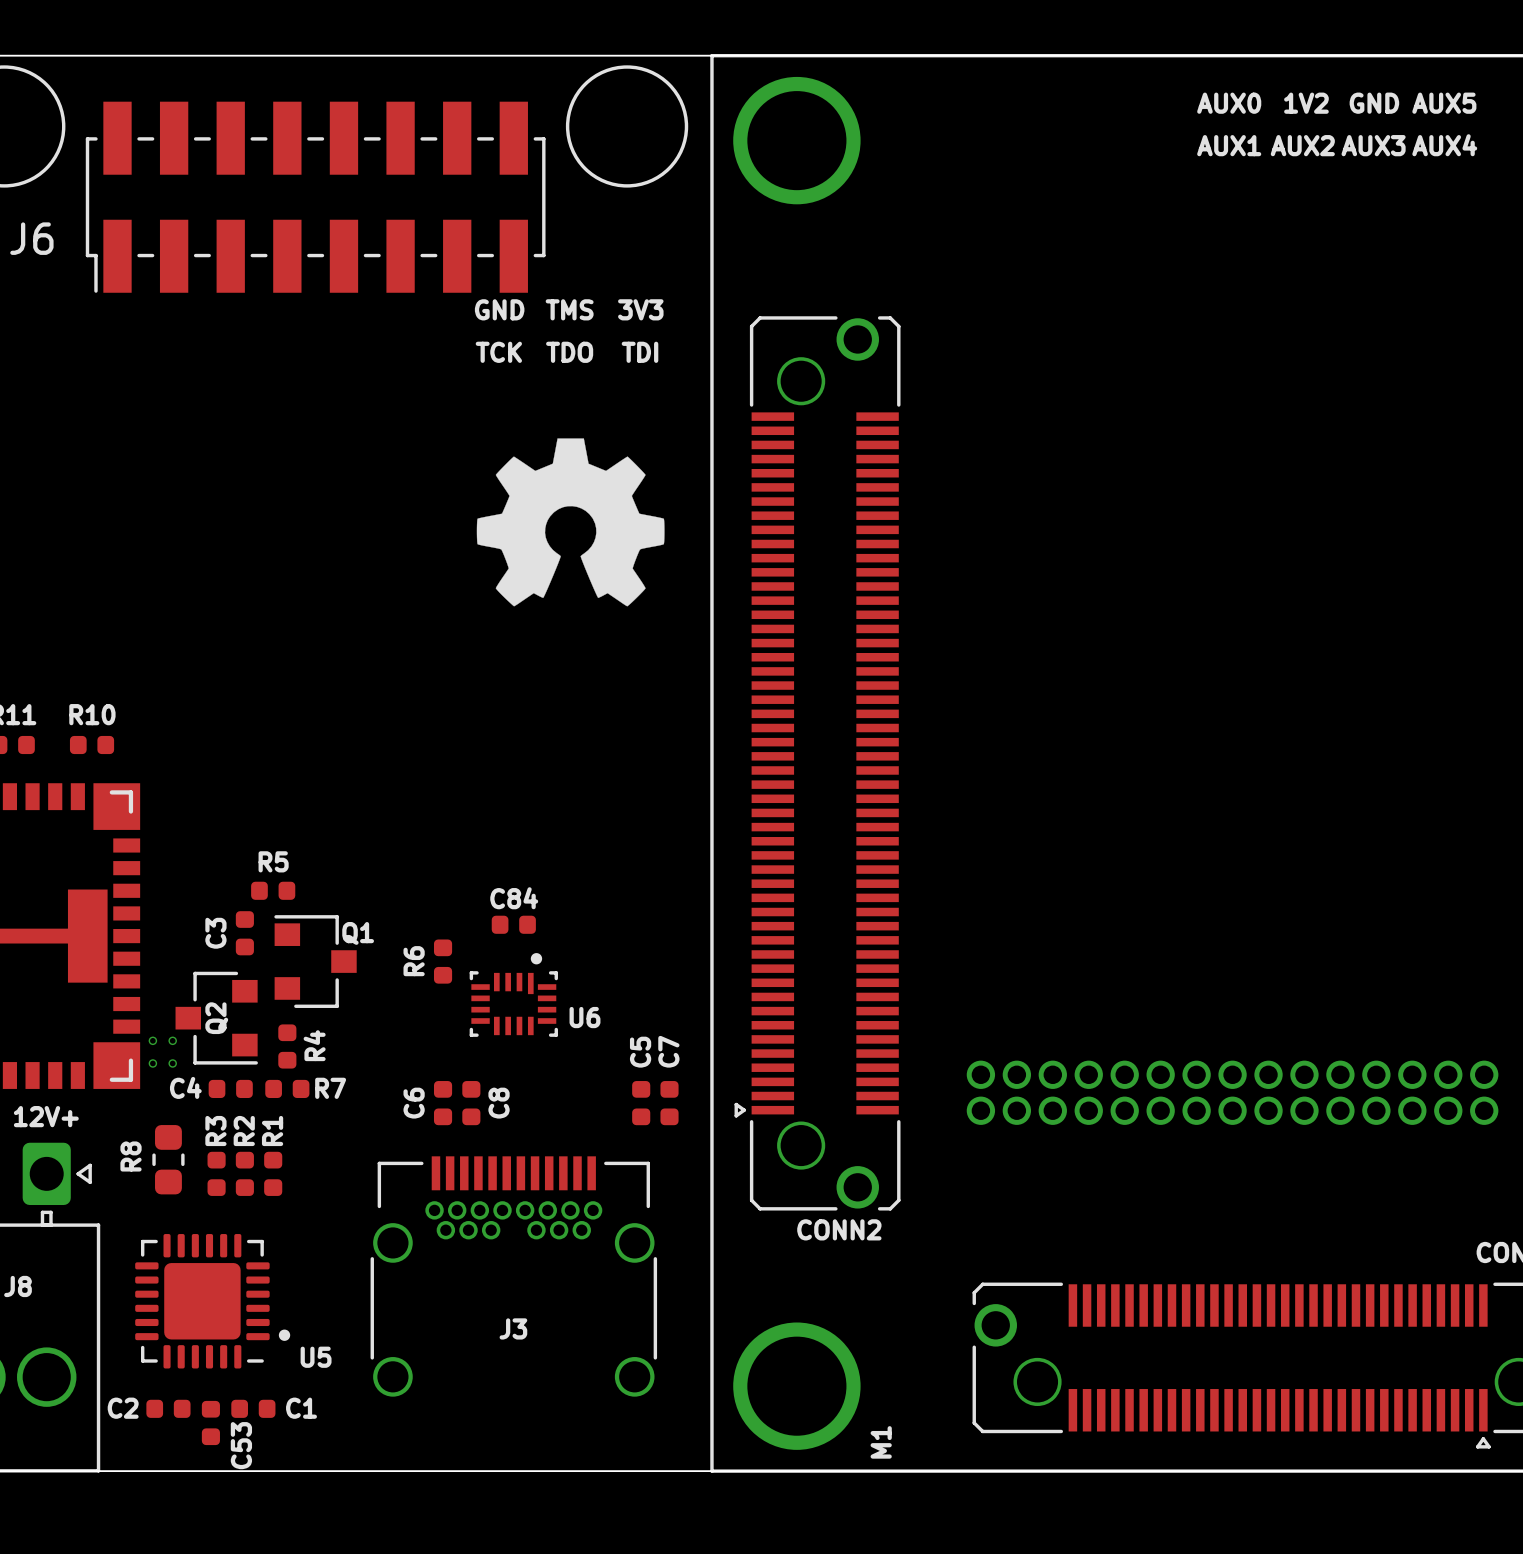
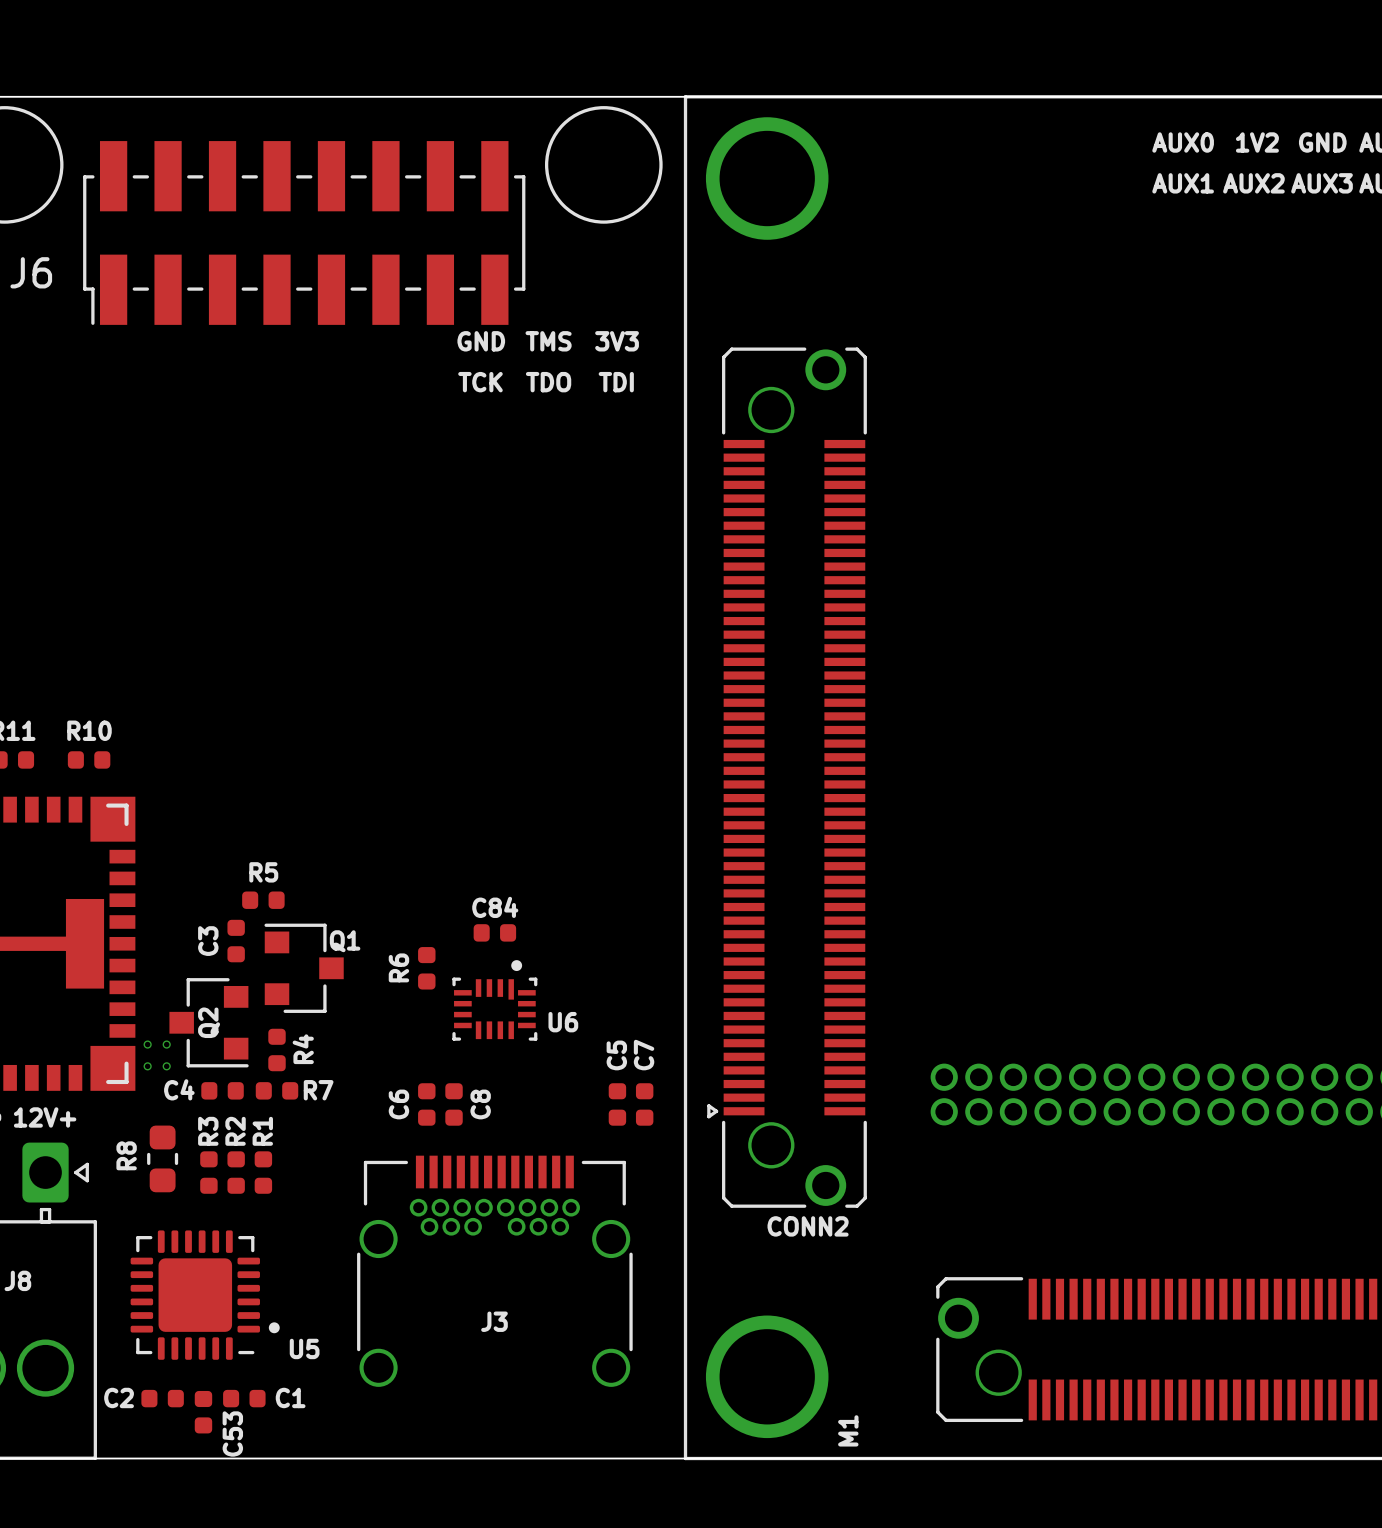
drawing: [476, 438, 665, 607] -> none

